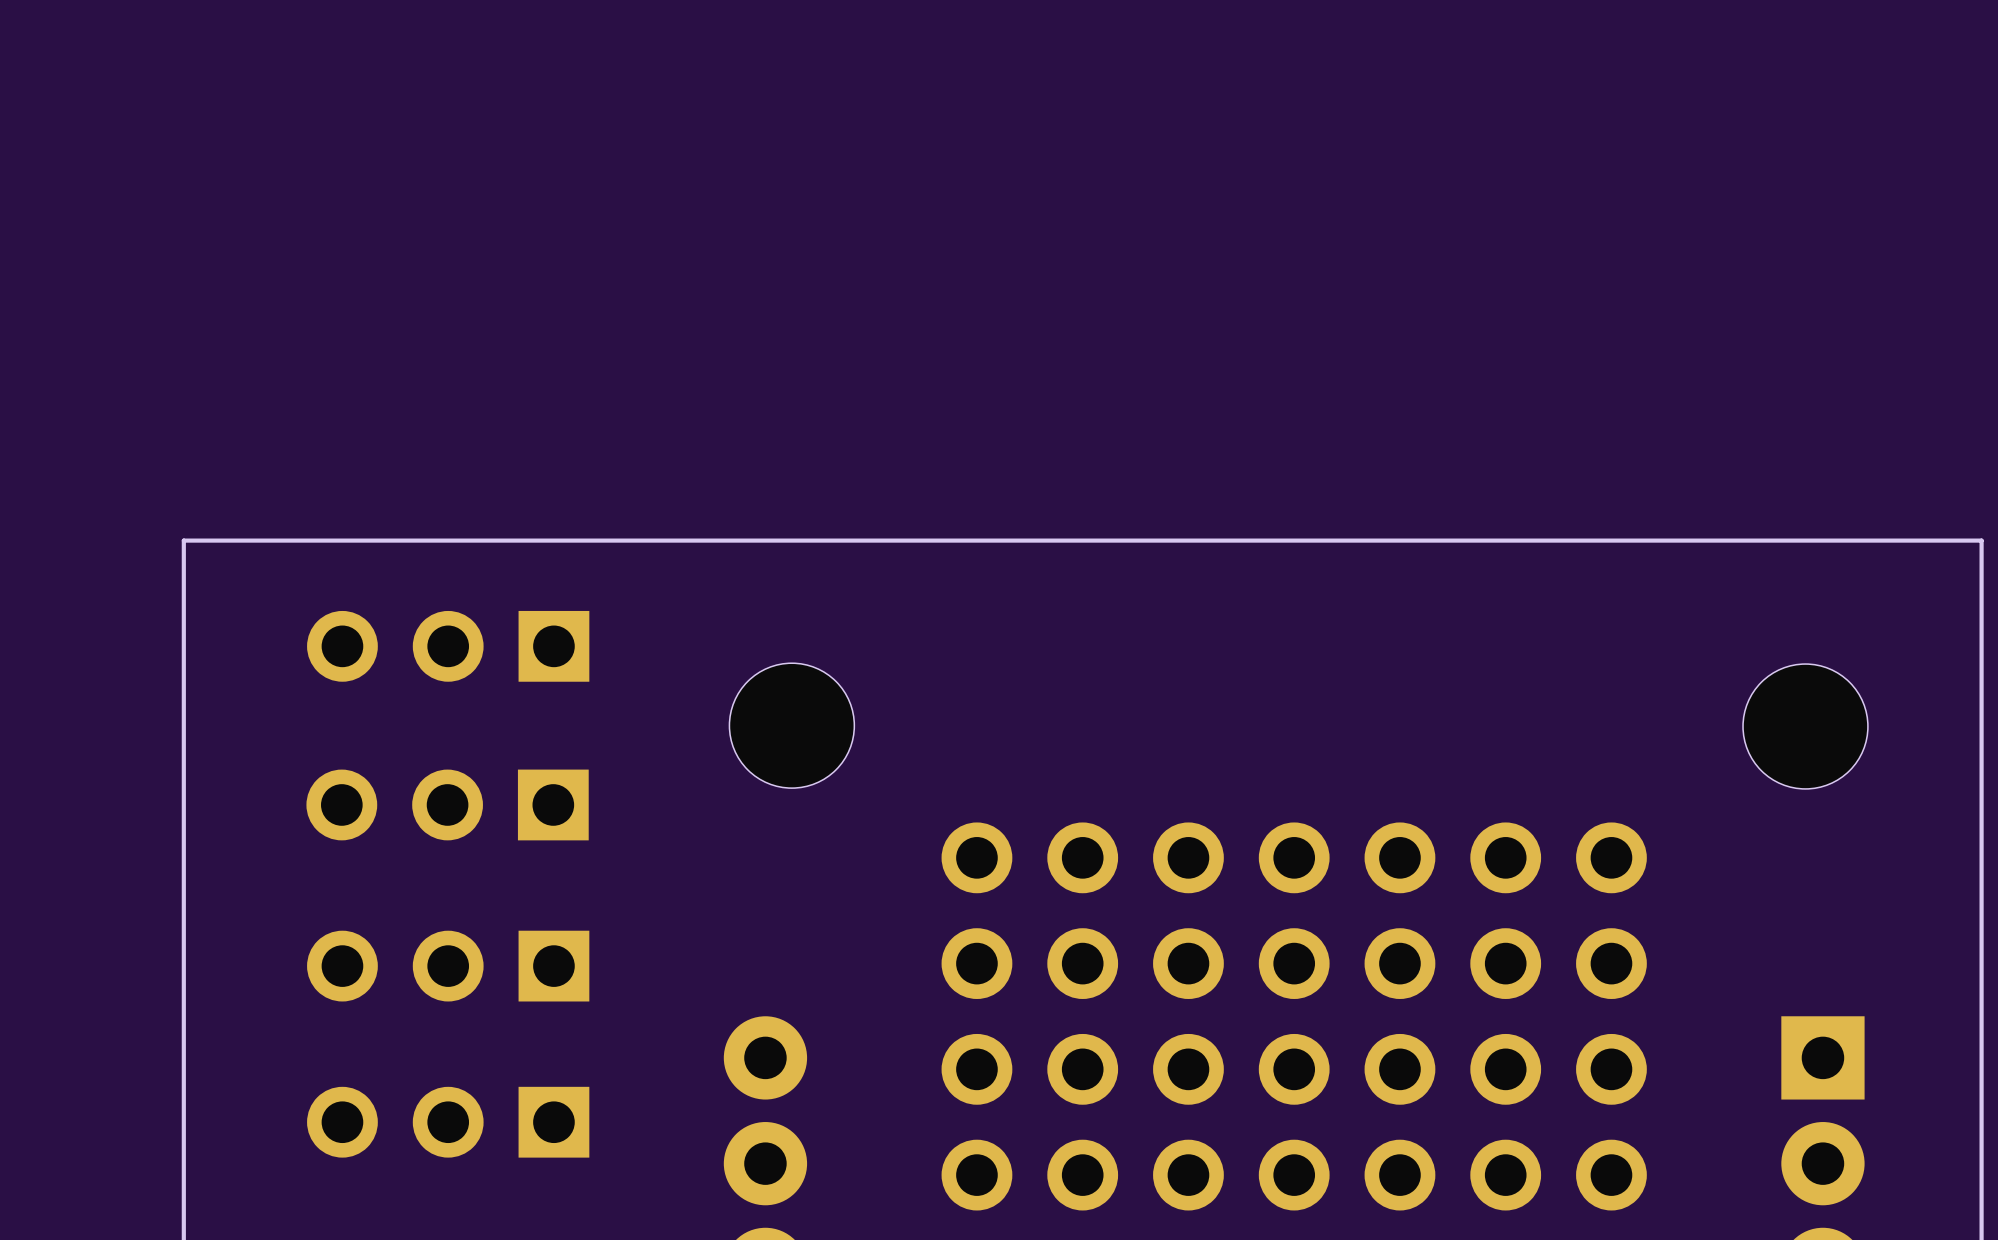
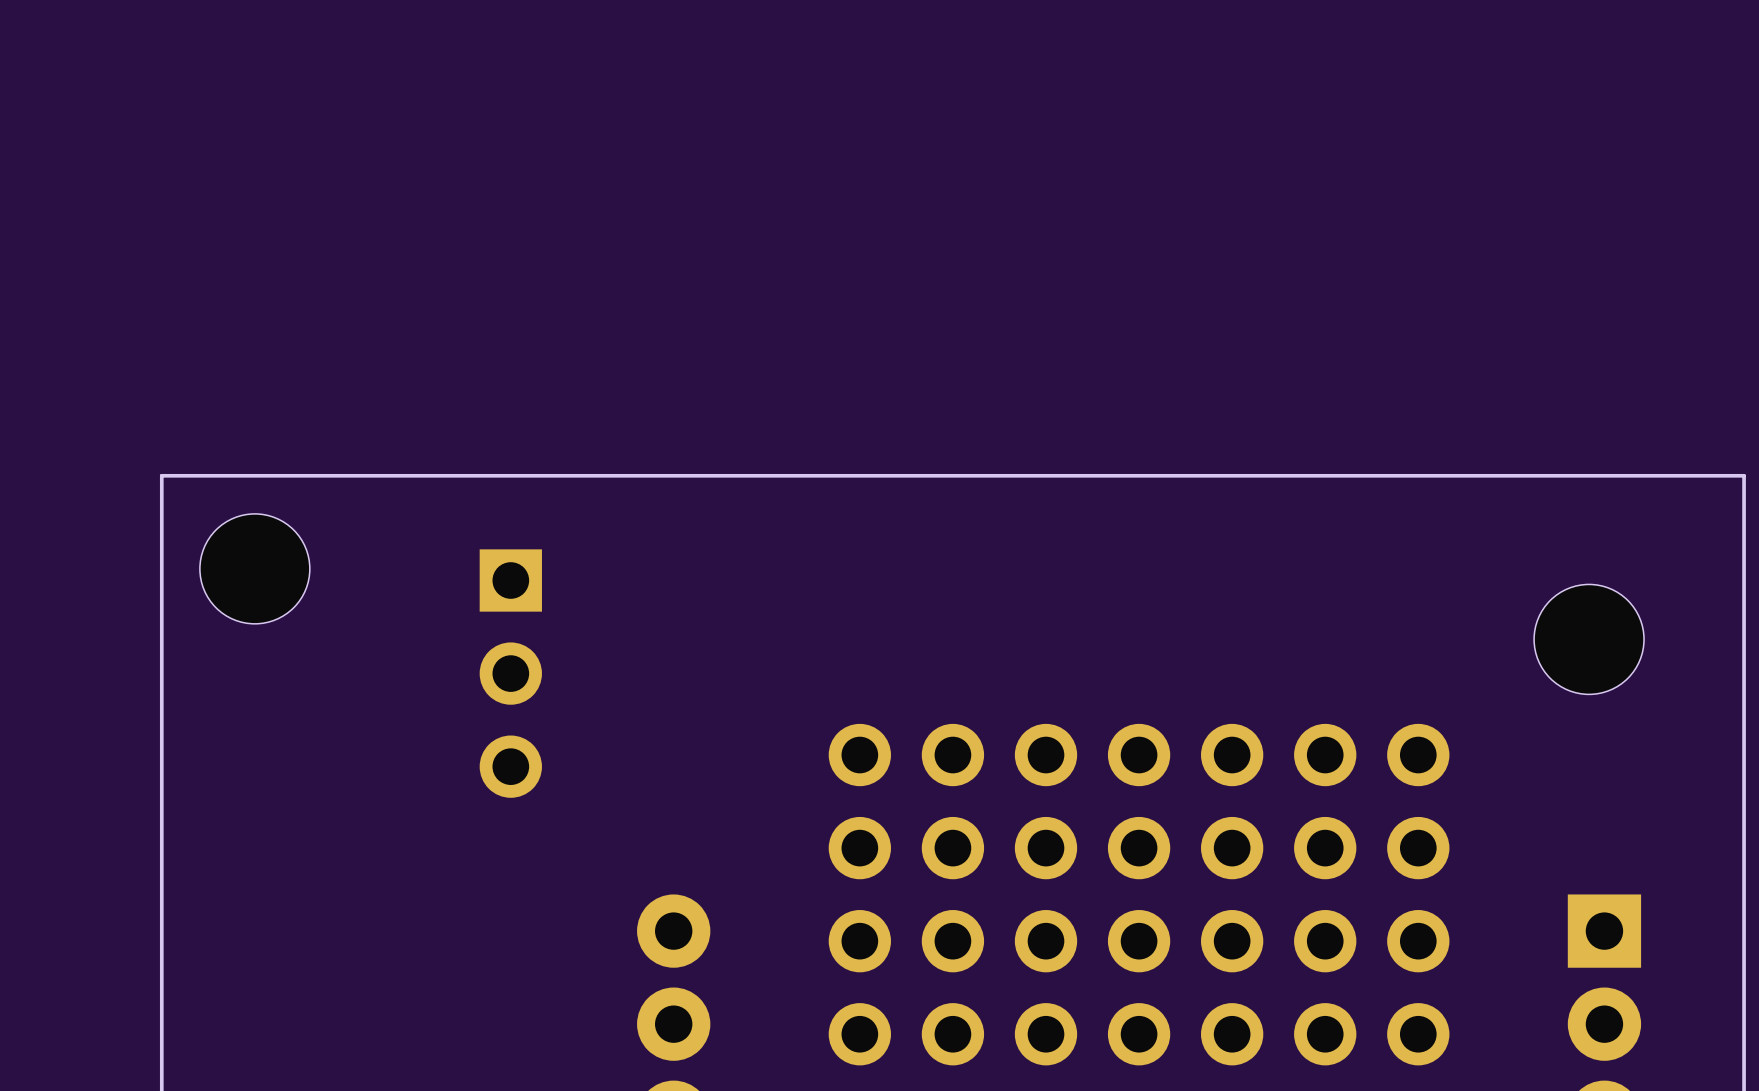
part: (448, 646) -> none
part position: (791, 725) -> (254, 568)
part: none -> (510, 673)
part: (447, 804) -> none
part: (448, 966) -> none
part: (448, 1122) -> none

